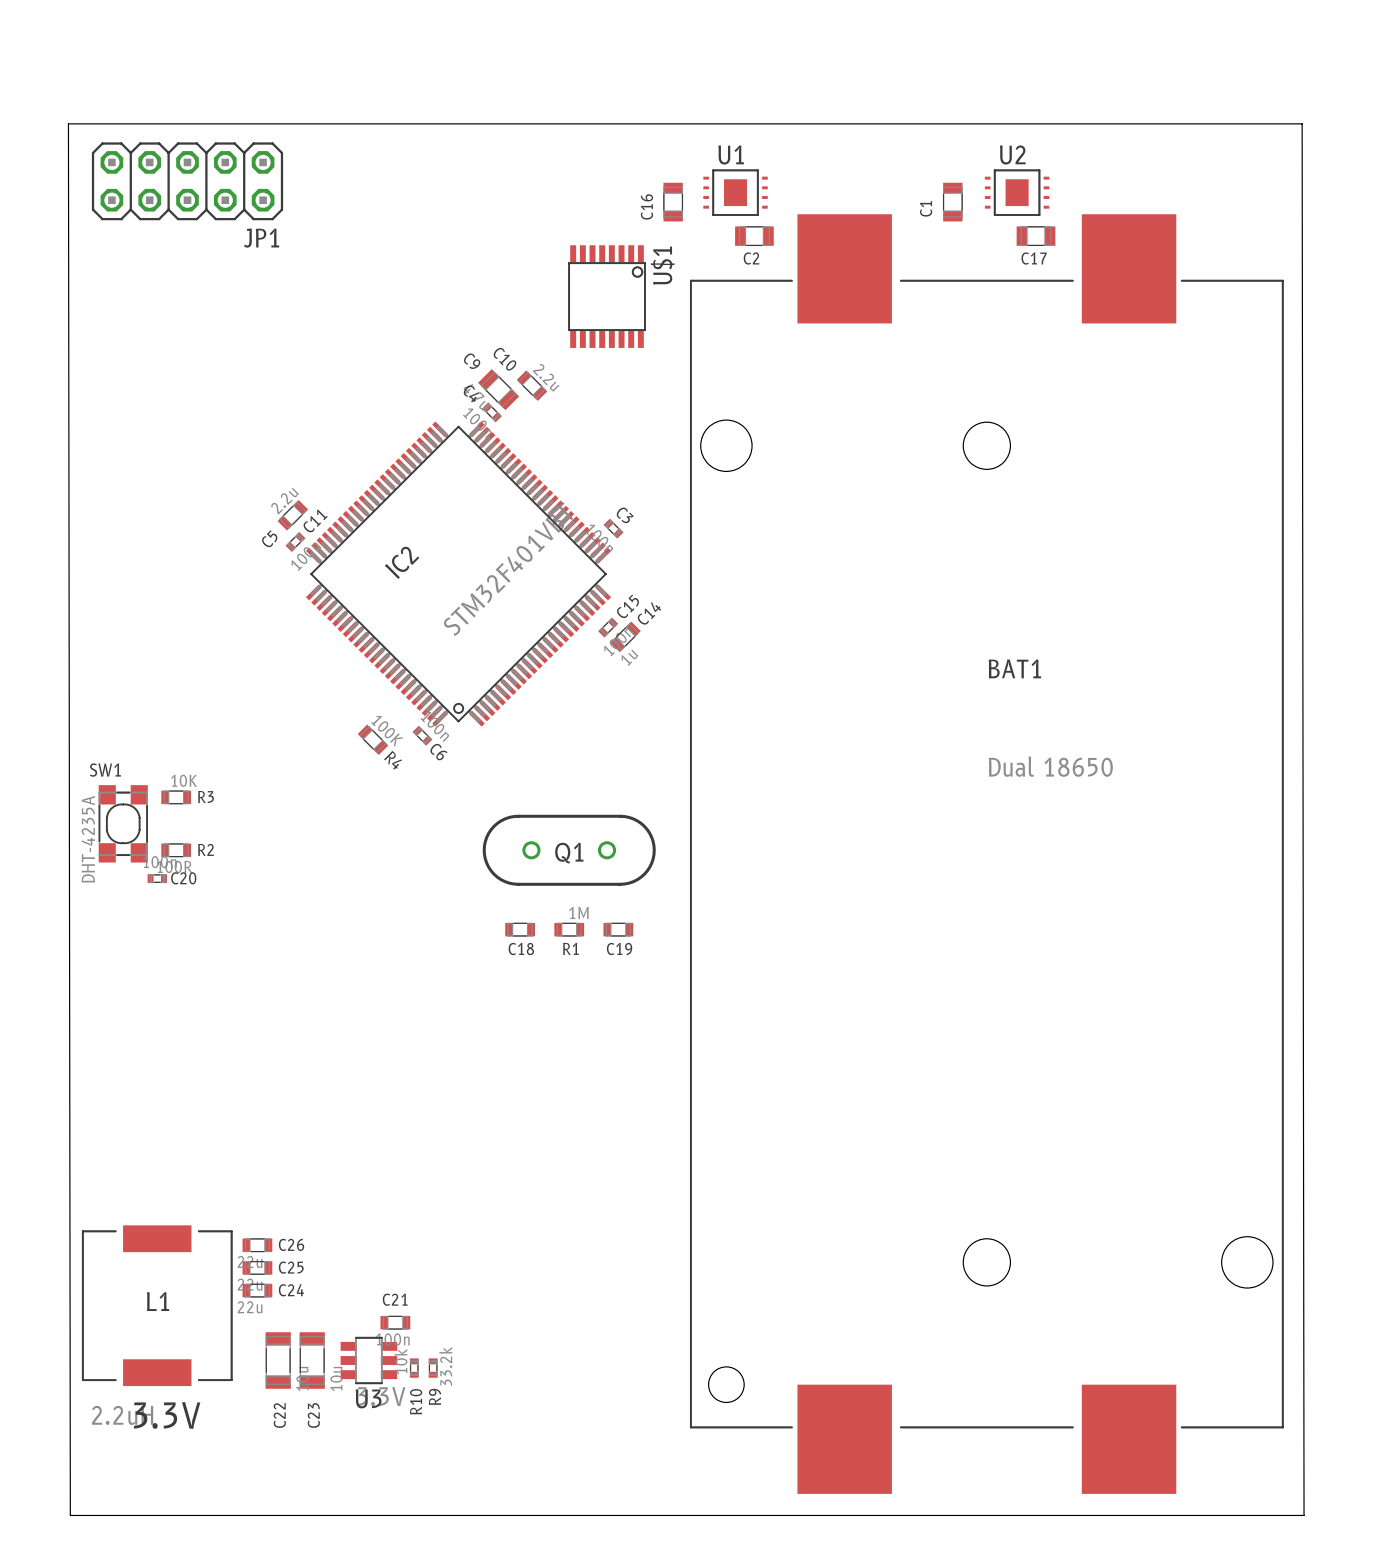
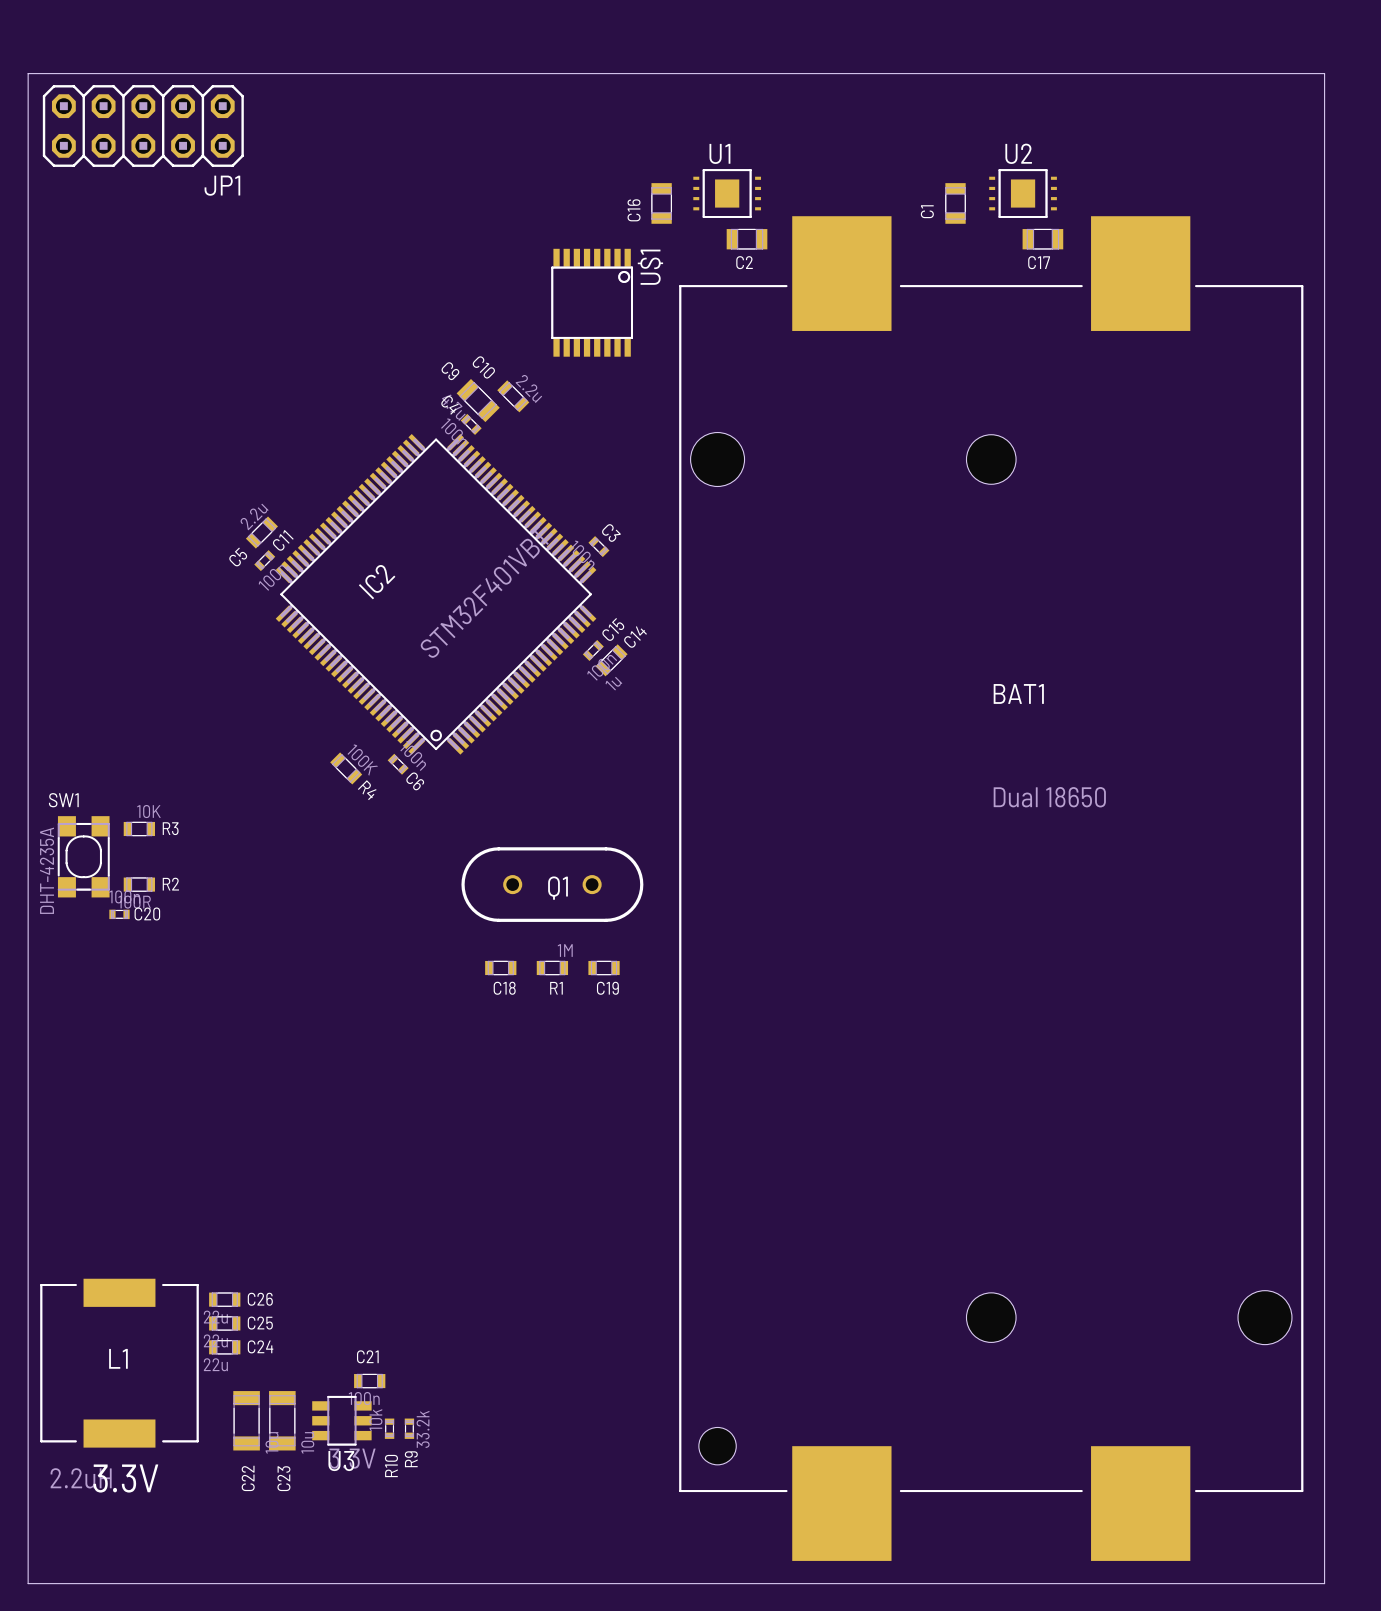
JP1 position: (187, 181) -> (143, 126)
board edge: (70, 1515) (68, 123) (1302, 123) (1304, 1515) -> (28, 1583) (28, 73) (1324, 73) (1324, 1583)

